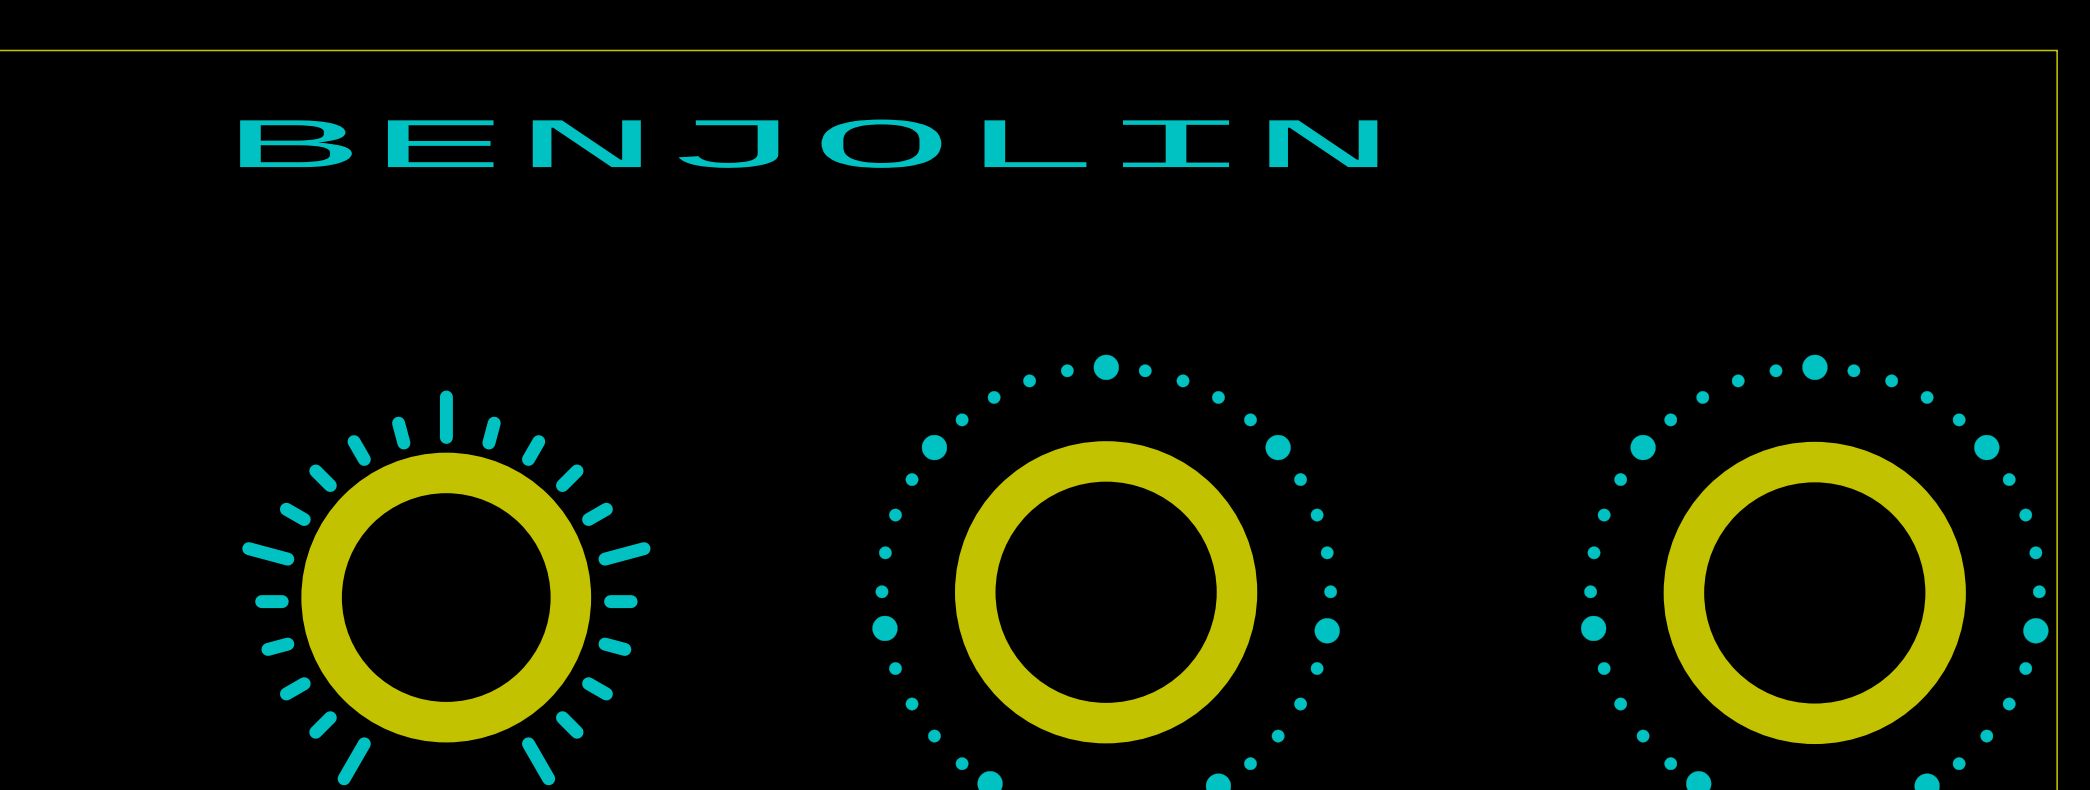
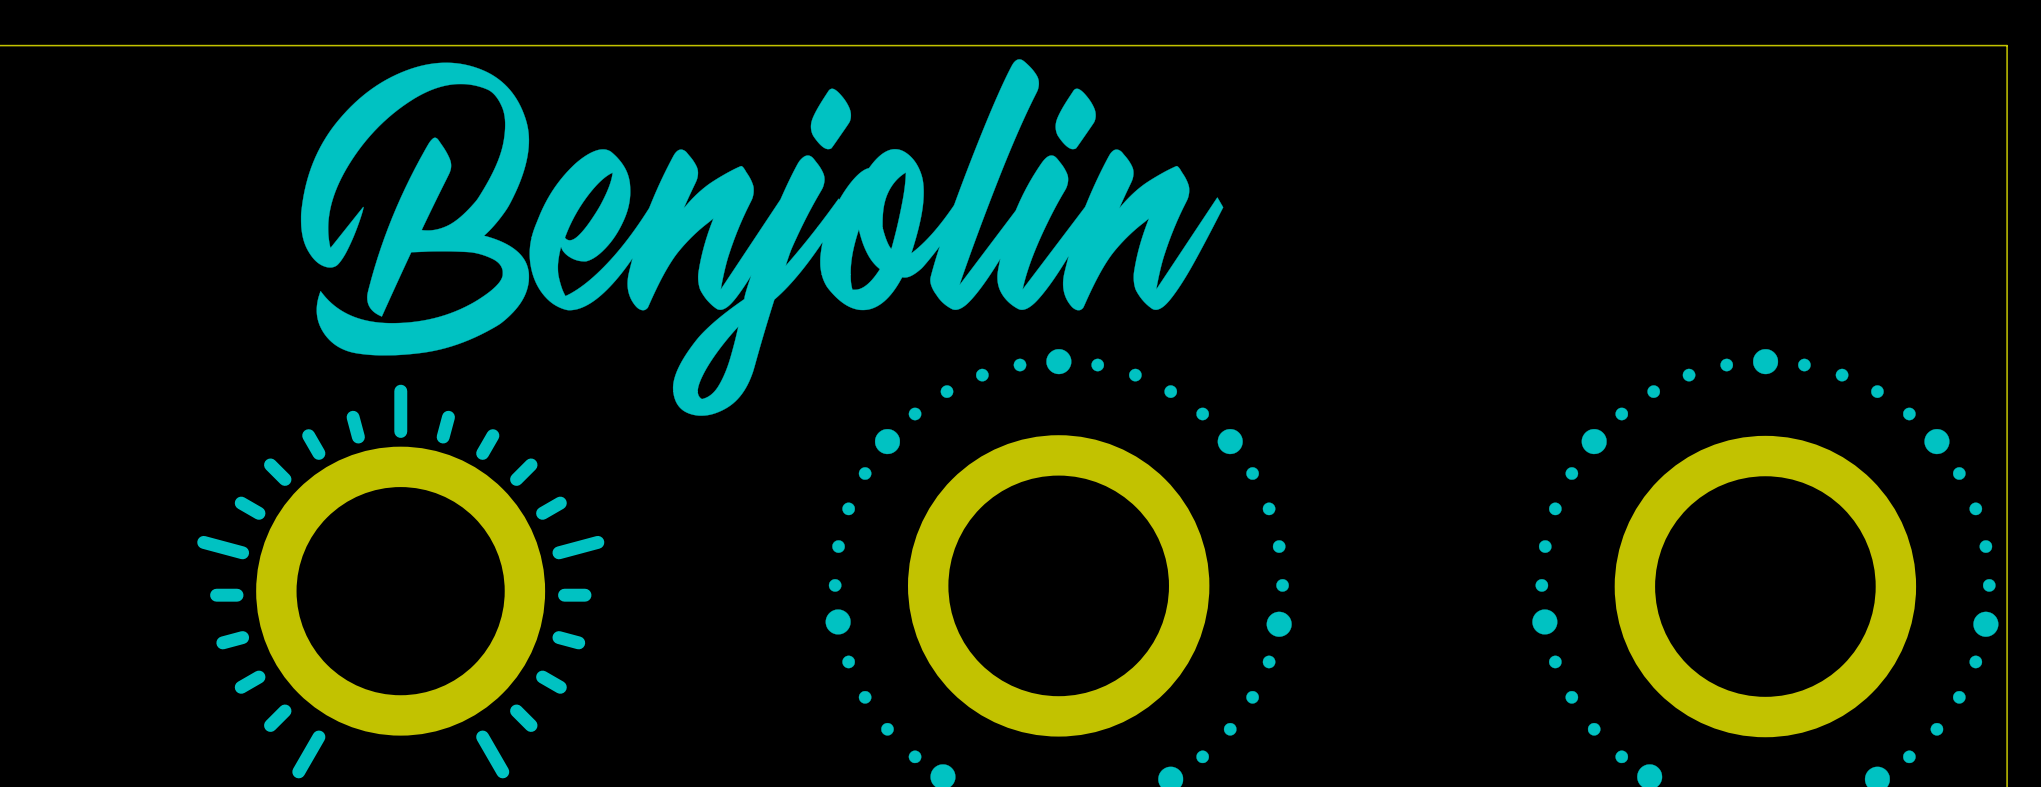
drawing: none -> [300, 59, 1224, 416]
text: BENJOLIN (808, 143) -> none

